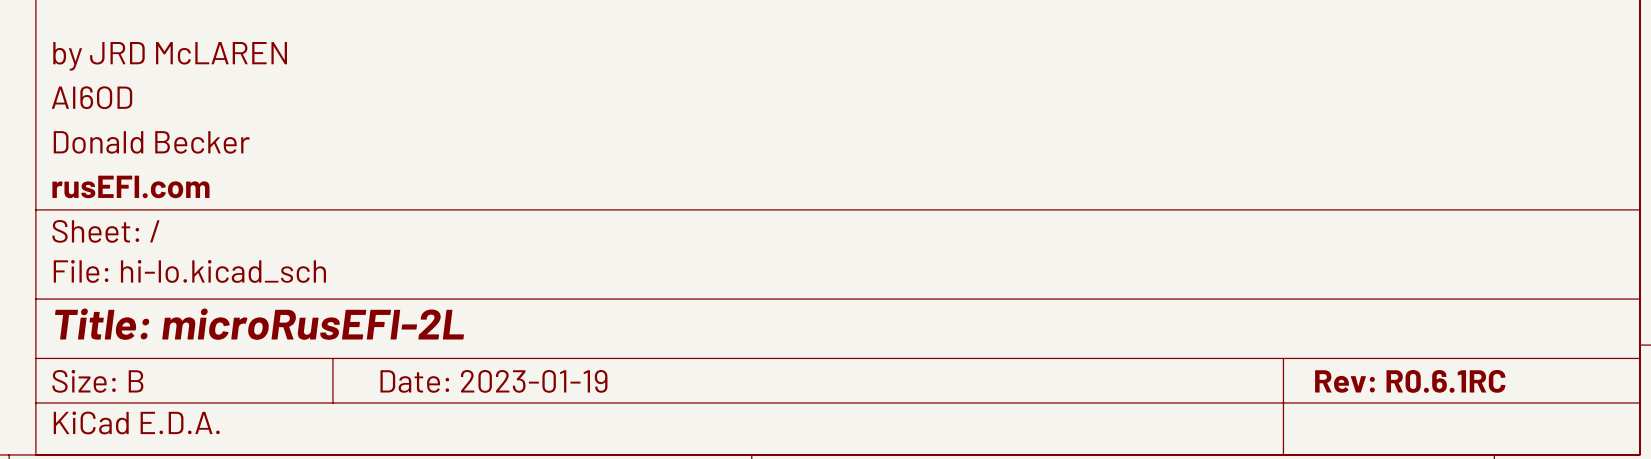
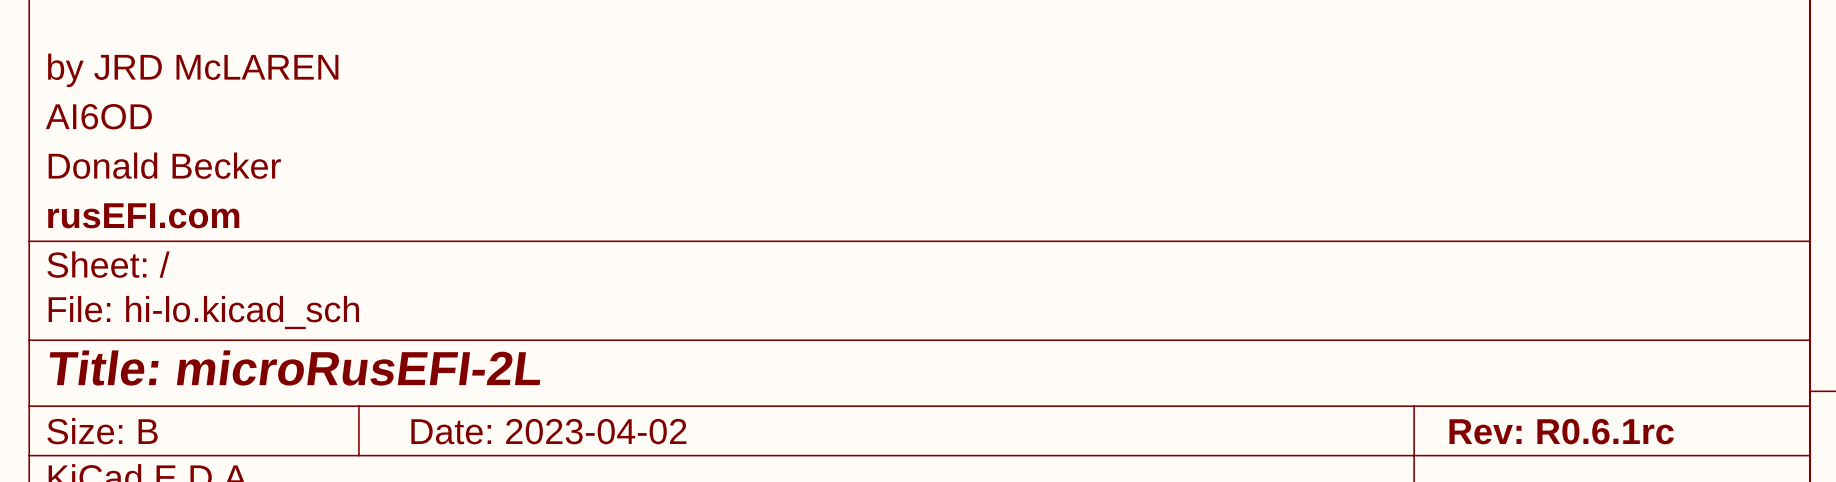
title block: Date: 2023-01-19 (493, 381) -> Date: 2023-04-02 (548, 431)
title block: Rev: R0.6.1RC (1410, 381) -> Rev: R0.6.1rc (1561, 431)

